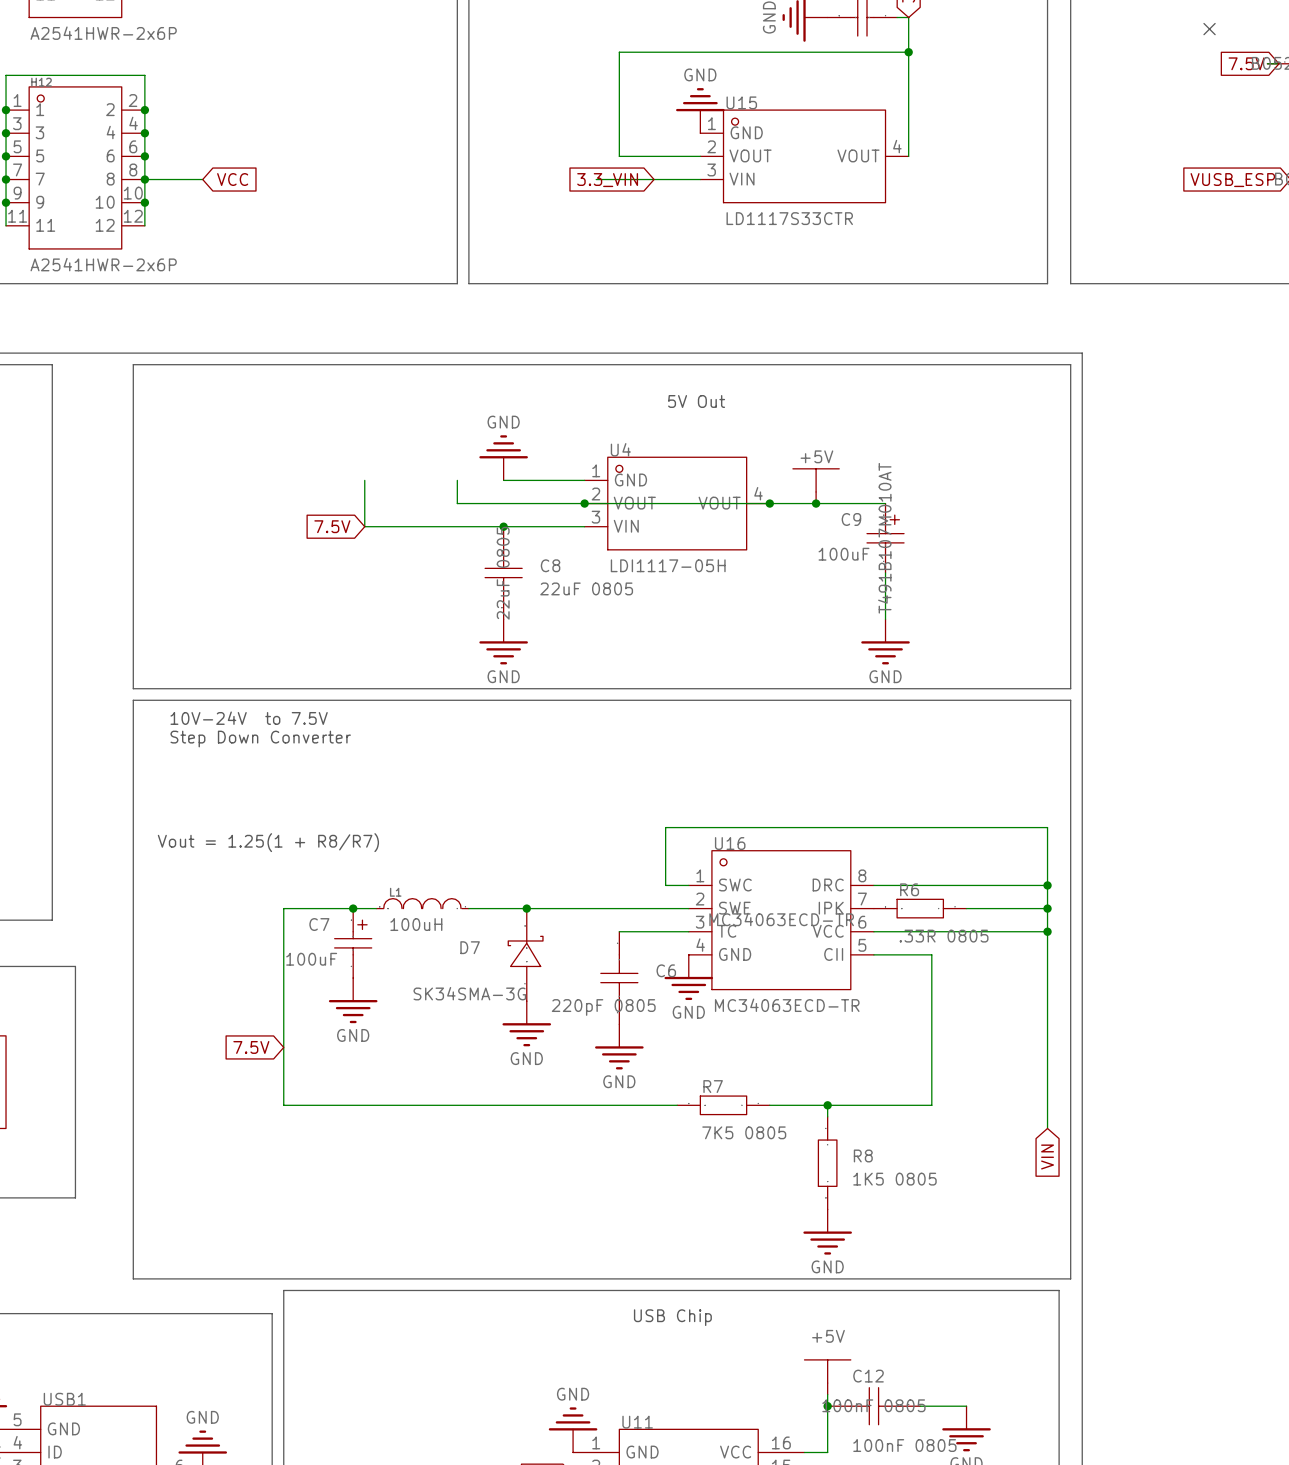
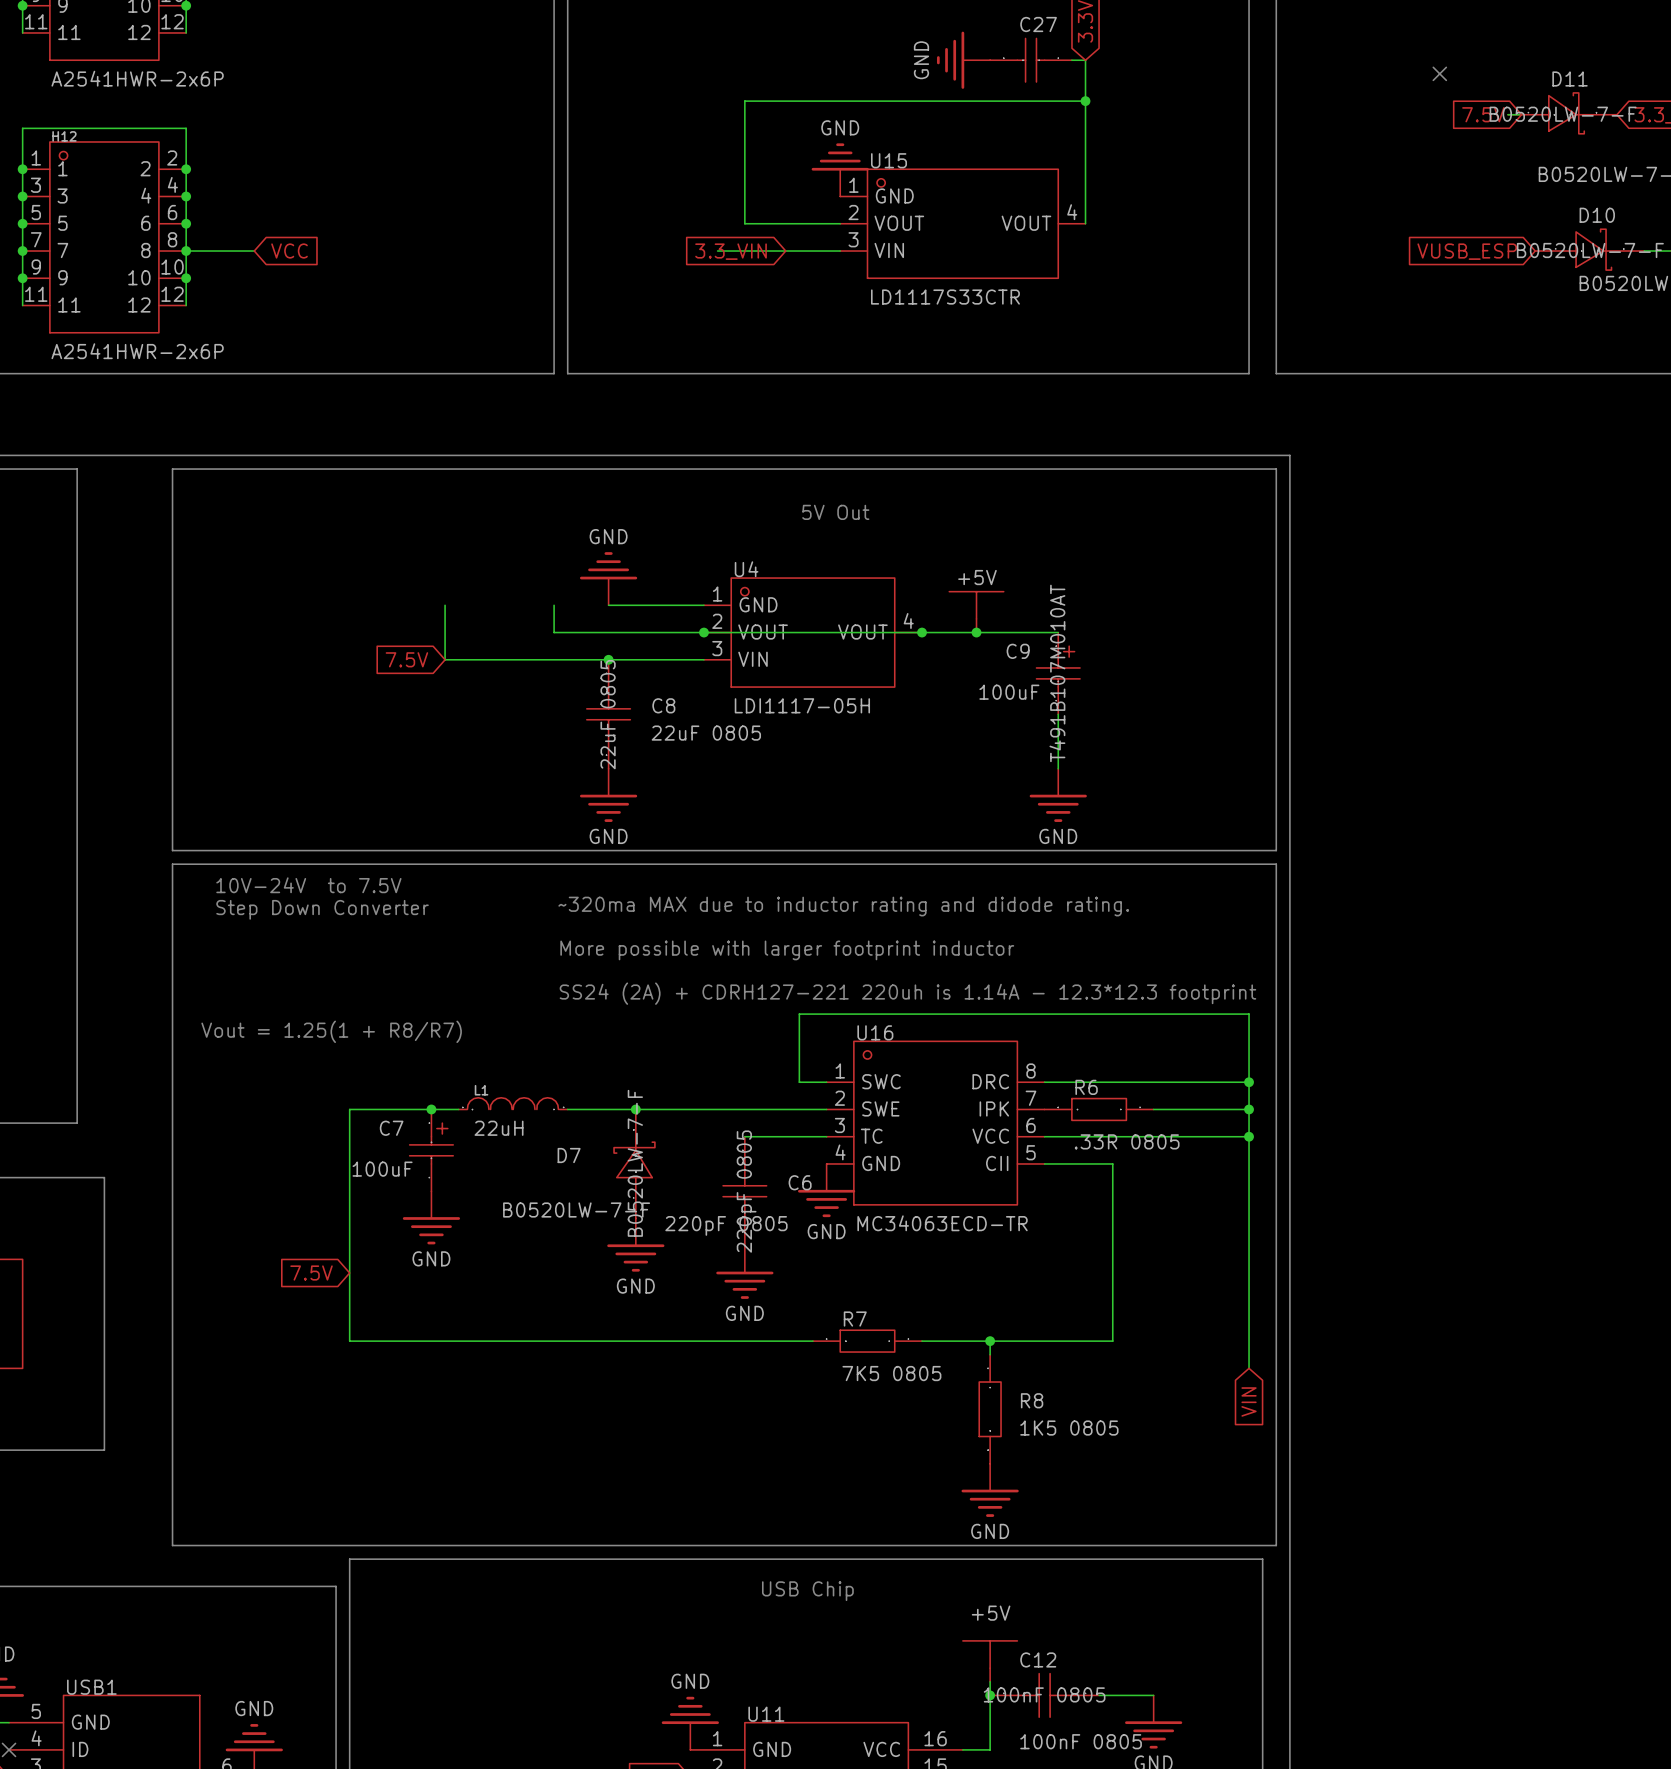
text: none -> ~320ma MAX due to inductor rating and didode rating. (843, 906)
text: none -> More possible with larger footprint inductor (787, 950)
text: none -> SS24 (2A) + CDRH127-221 220uh is 1.14A - 12.3*12.3 footprint (907, 993)
U16 text: MC34063ECD-TR (781, 919) -> none
L1 value: 100uH (416, 924) -> 22uH (499, 1128)
D7 text: none -> B0520LW-7-F (635, 1163)
C6 text: none -> 220pF 0805 (746, 1191)
D7 value: SK34SMA-3G (469, 993) -> B0520LW-7-F (576, 1210)

